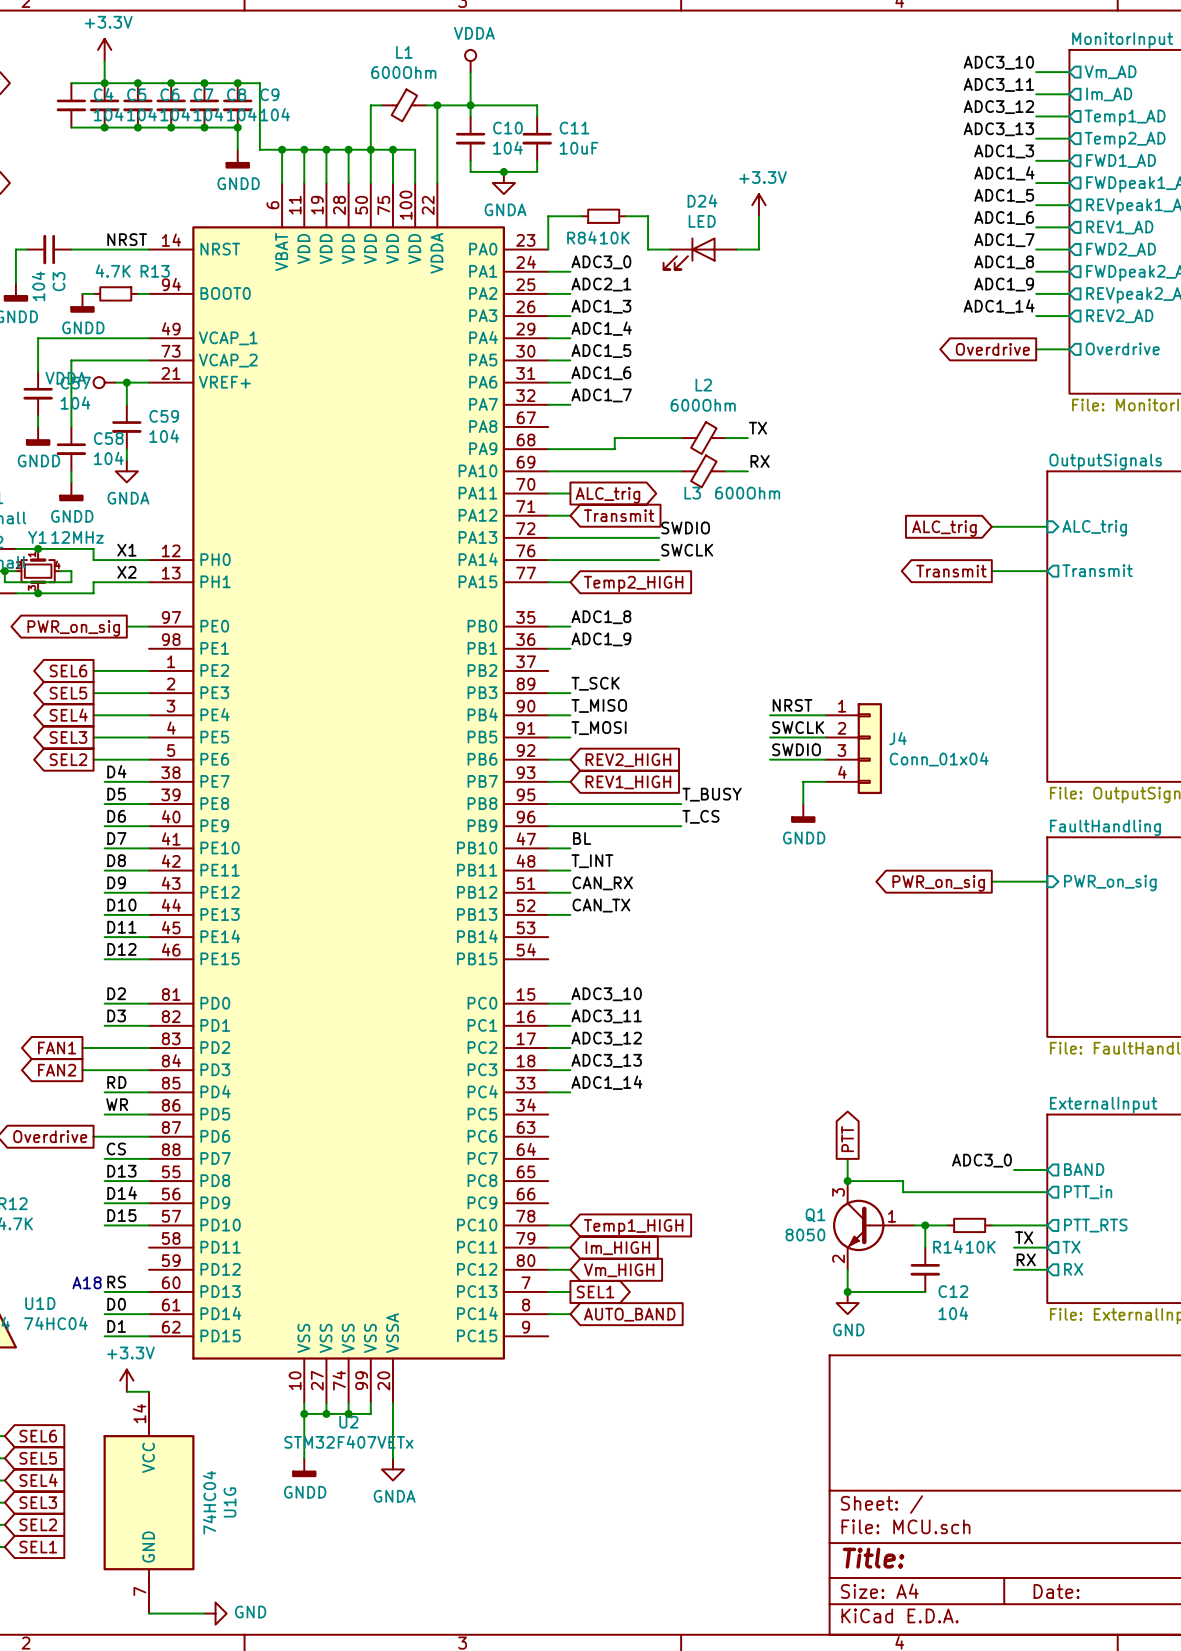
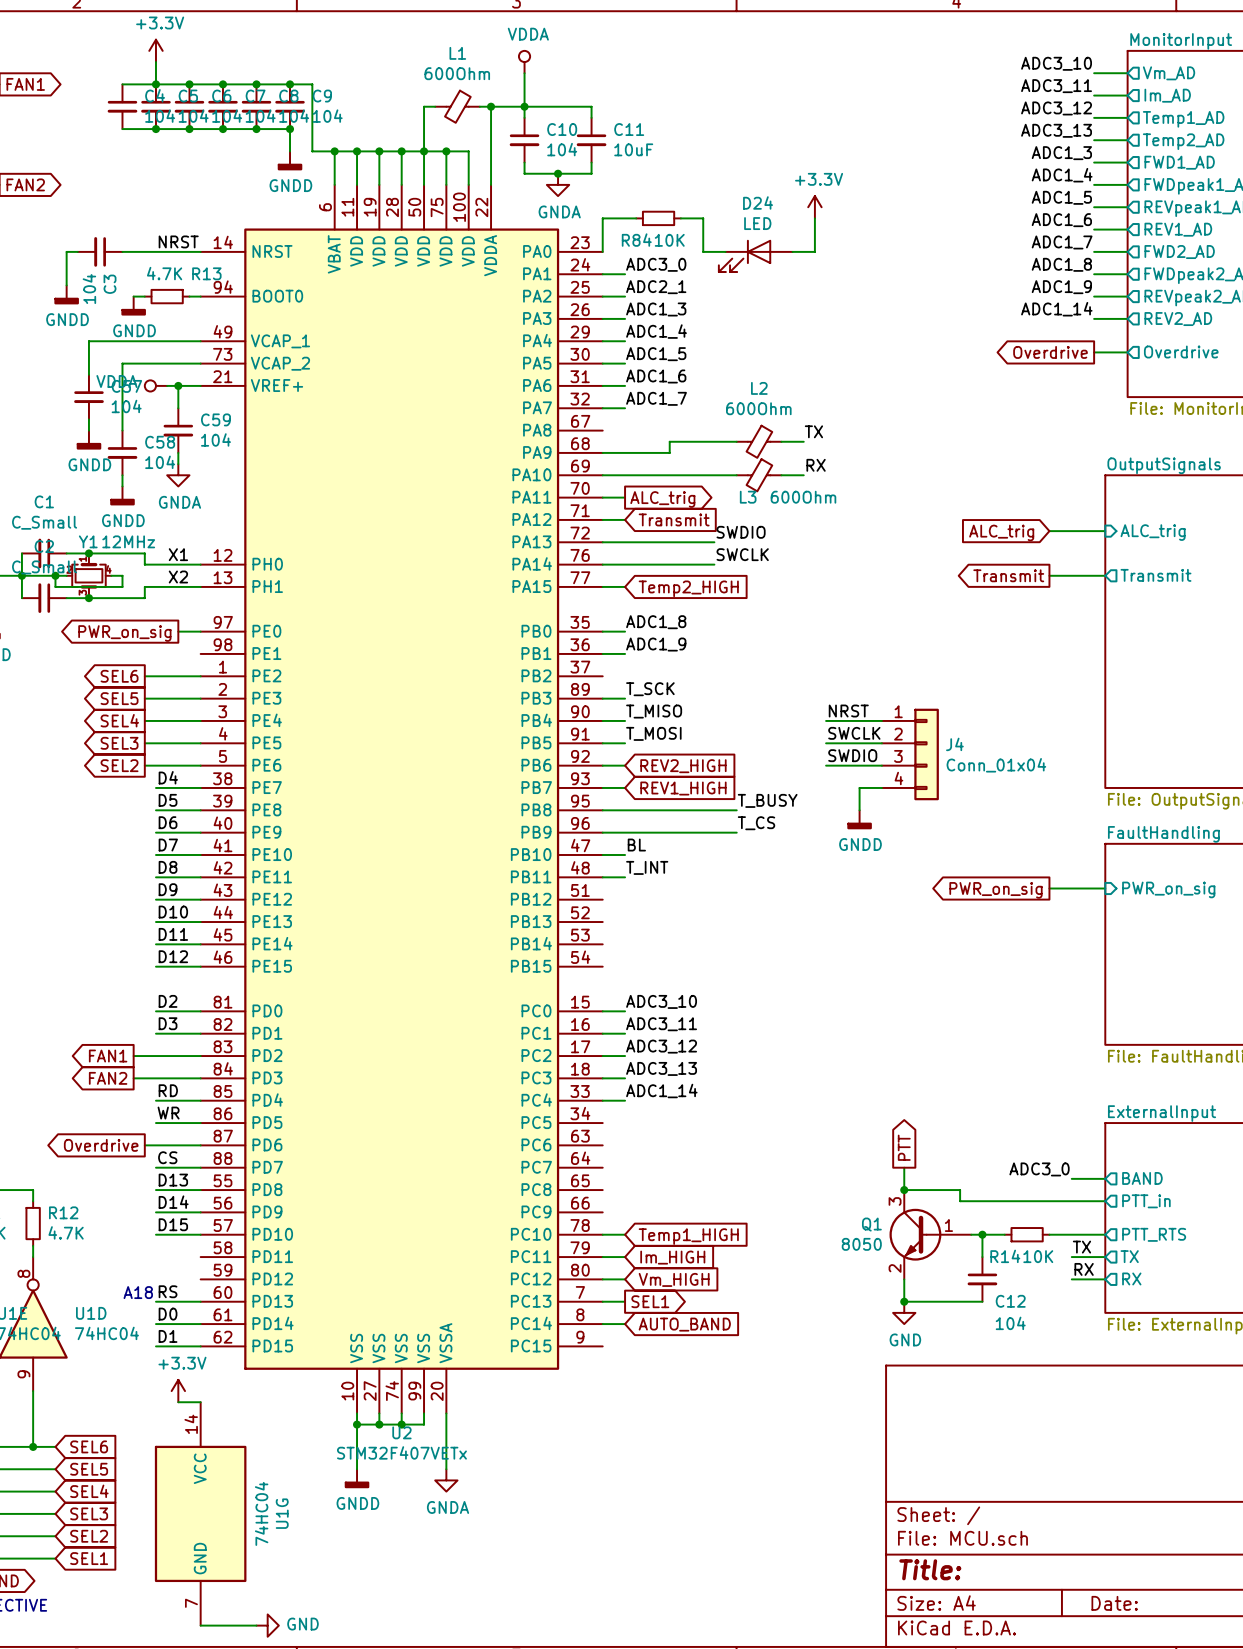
label: CAN_RX (602, 883) -> none
wire: (548, 892) (570, 892) -> none
label: CAN_TX (601, 905) -> none
wire: (548, 914) (570, 914) -> none

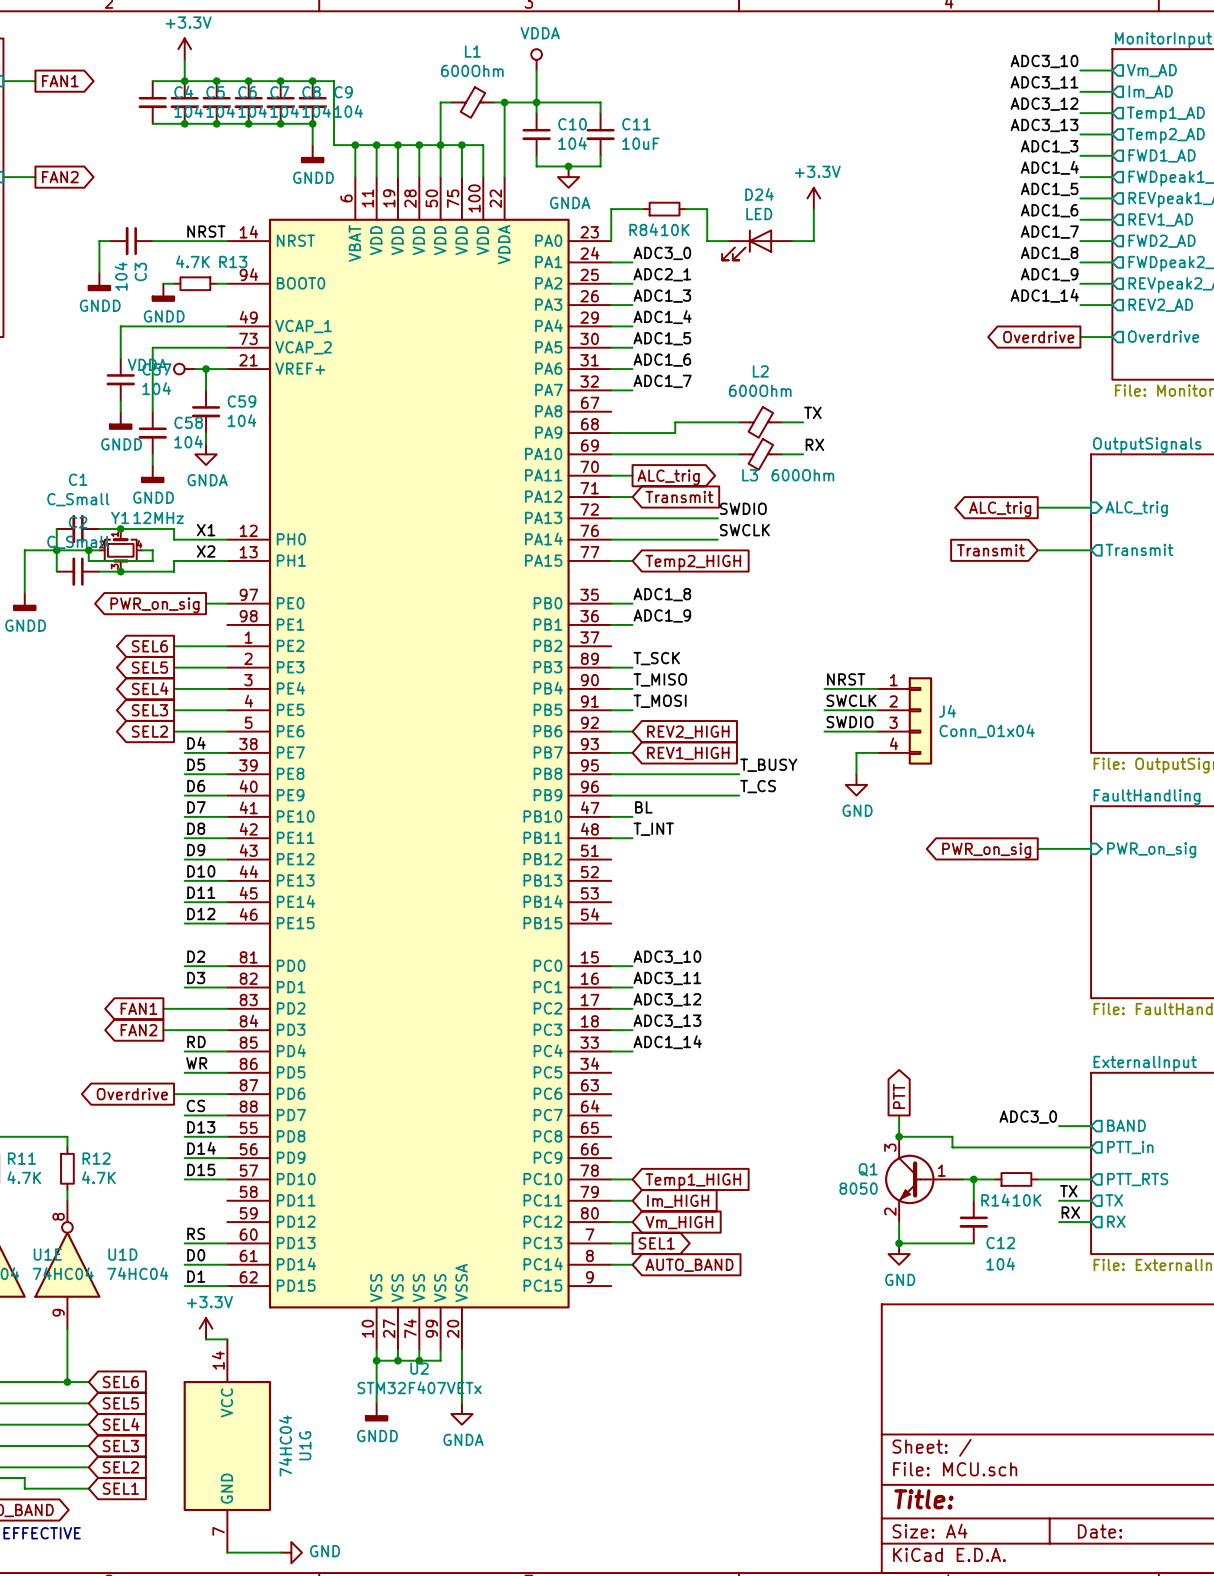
global label shape: input (1001, 532) -> output (1000, 509)
global label shape: output (1008, 575) -> input (990, 550)
power symbol: GNDD (859, 819) -> GND (856, 784)
text: A18 (138, 1292) -> none

